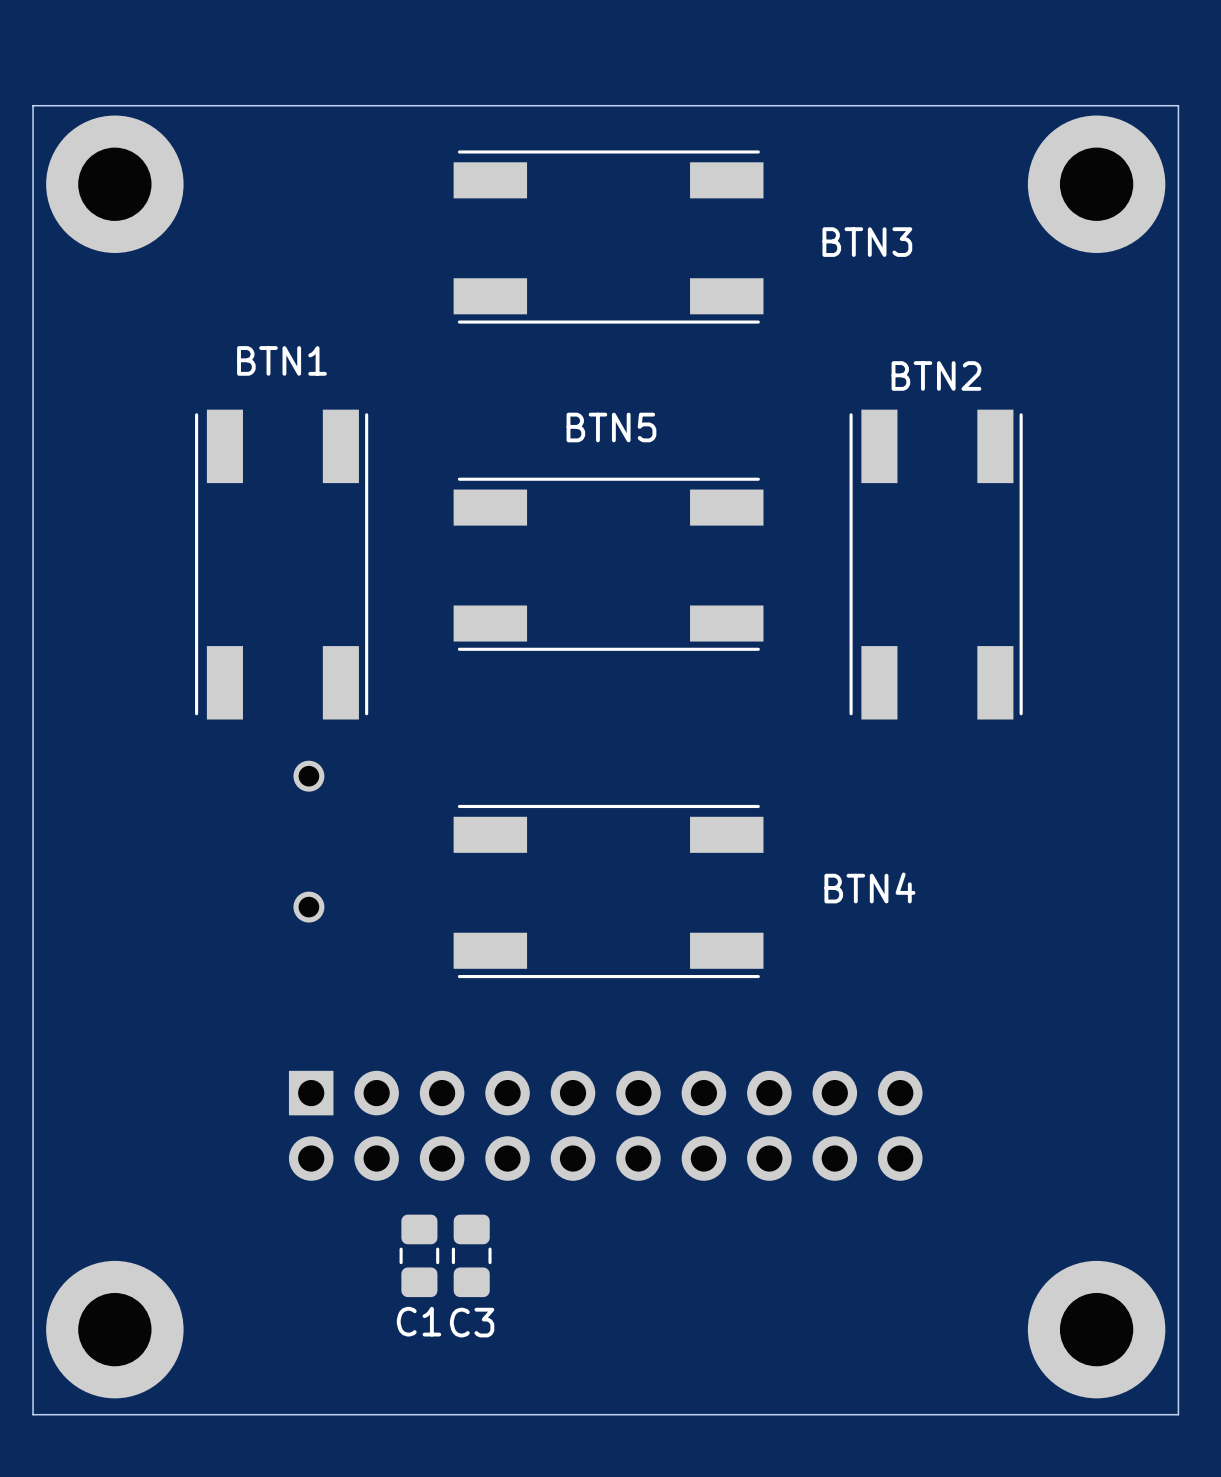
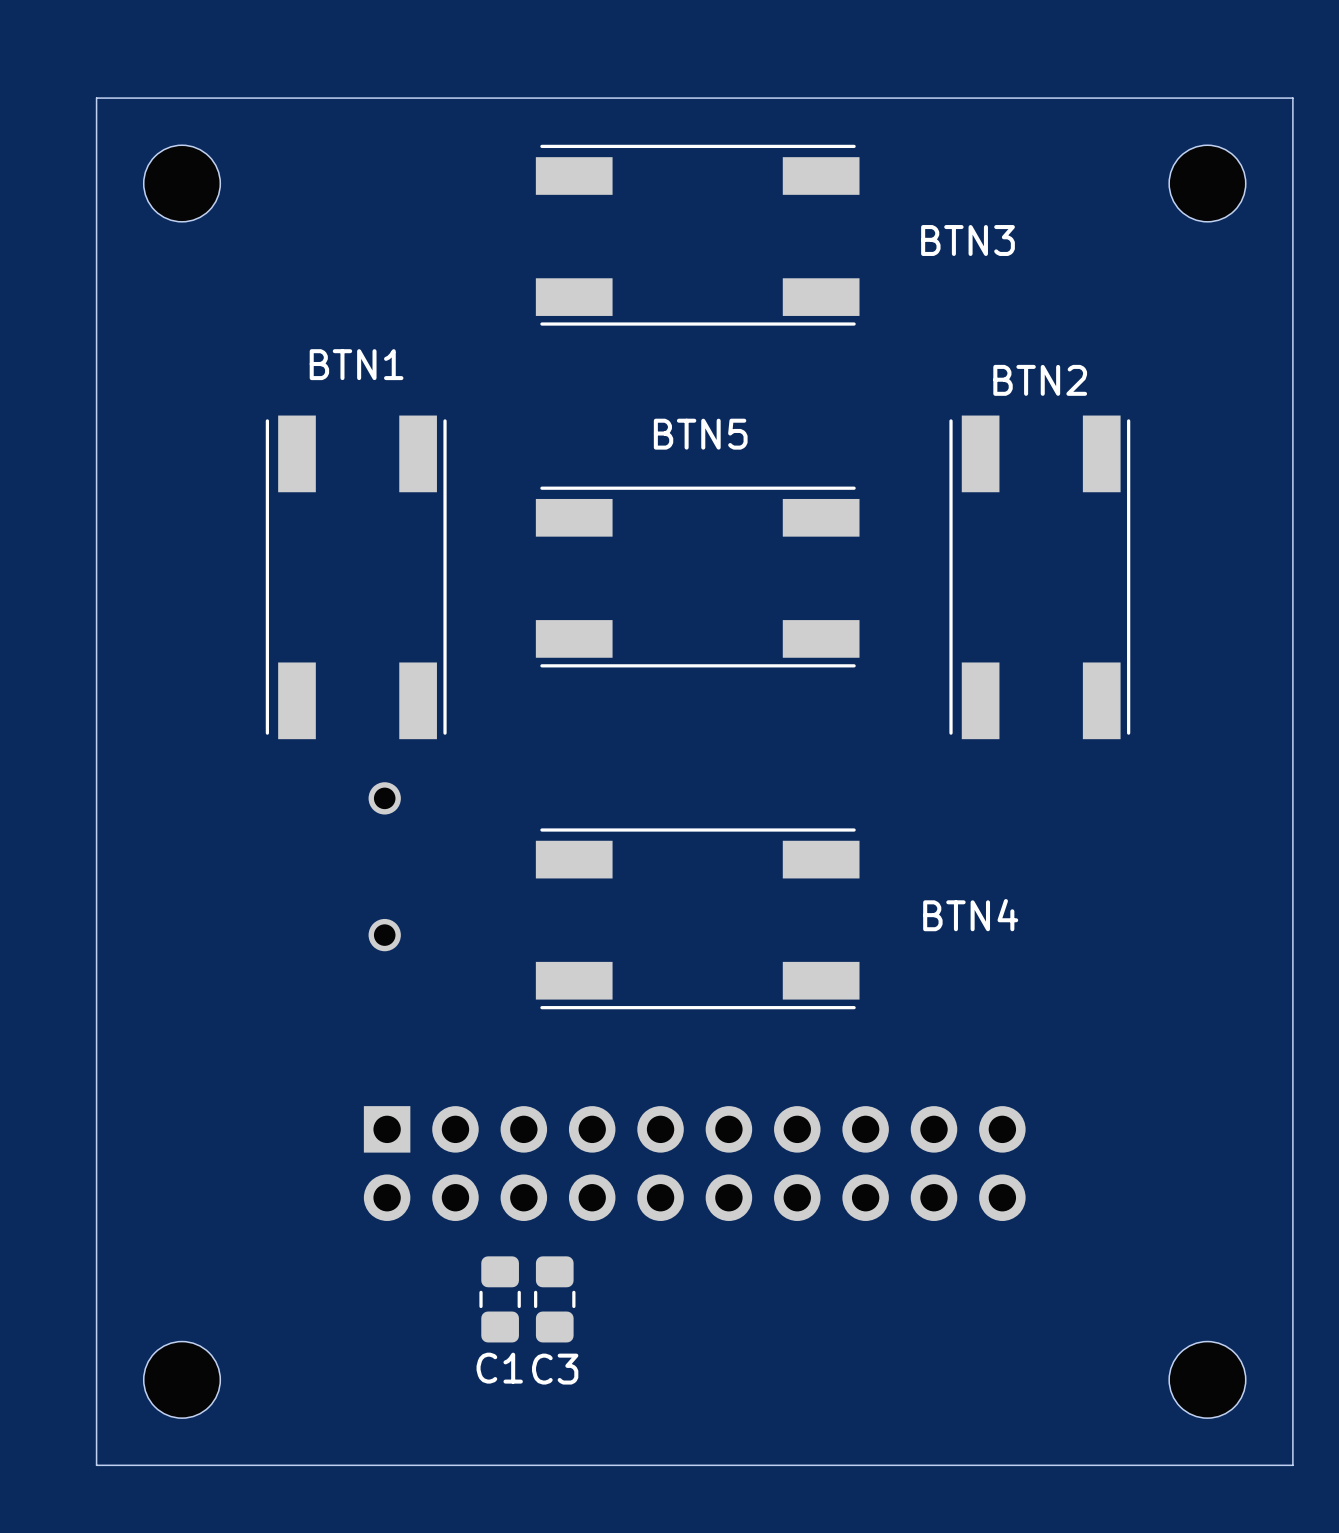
part footprint: [46, 115, 184, 253] -> [143, 145, 221, 222]
part footprint: [1027, 115, 1166, 253] -> [1169, 145, 1246, 222]
part footprint: [46, 1260, 184, 1399] -> [143, 1341, 221, 1419]
part footprint: [1027, 1260, 1166, 1399] -> [1169, 1341, 1246, 1419]

